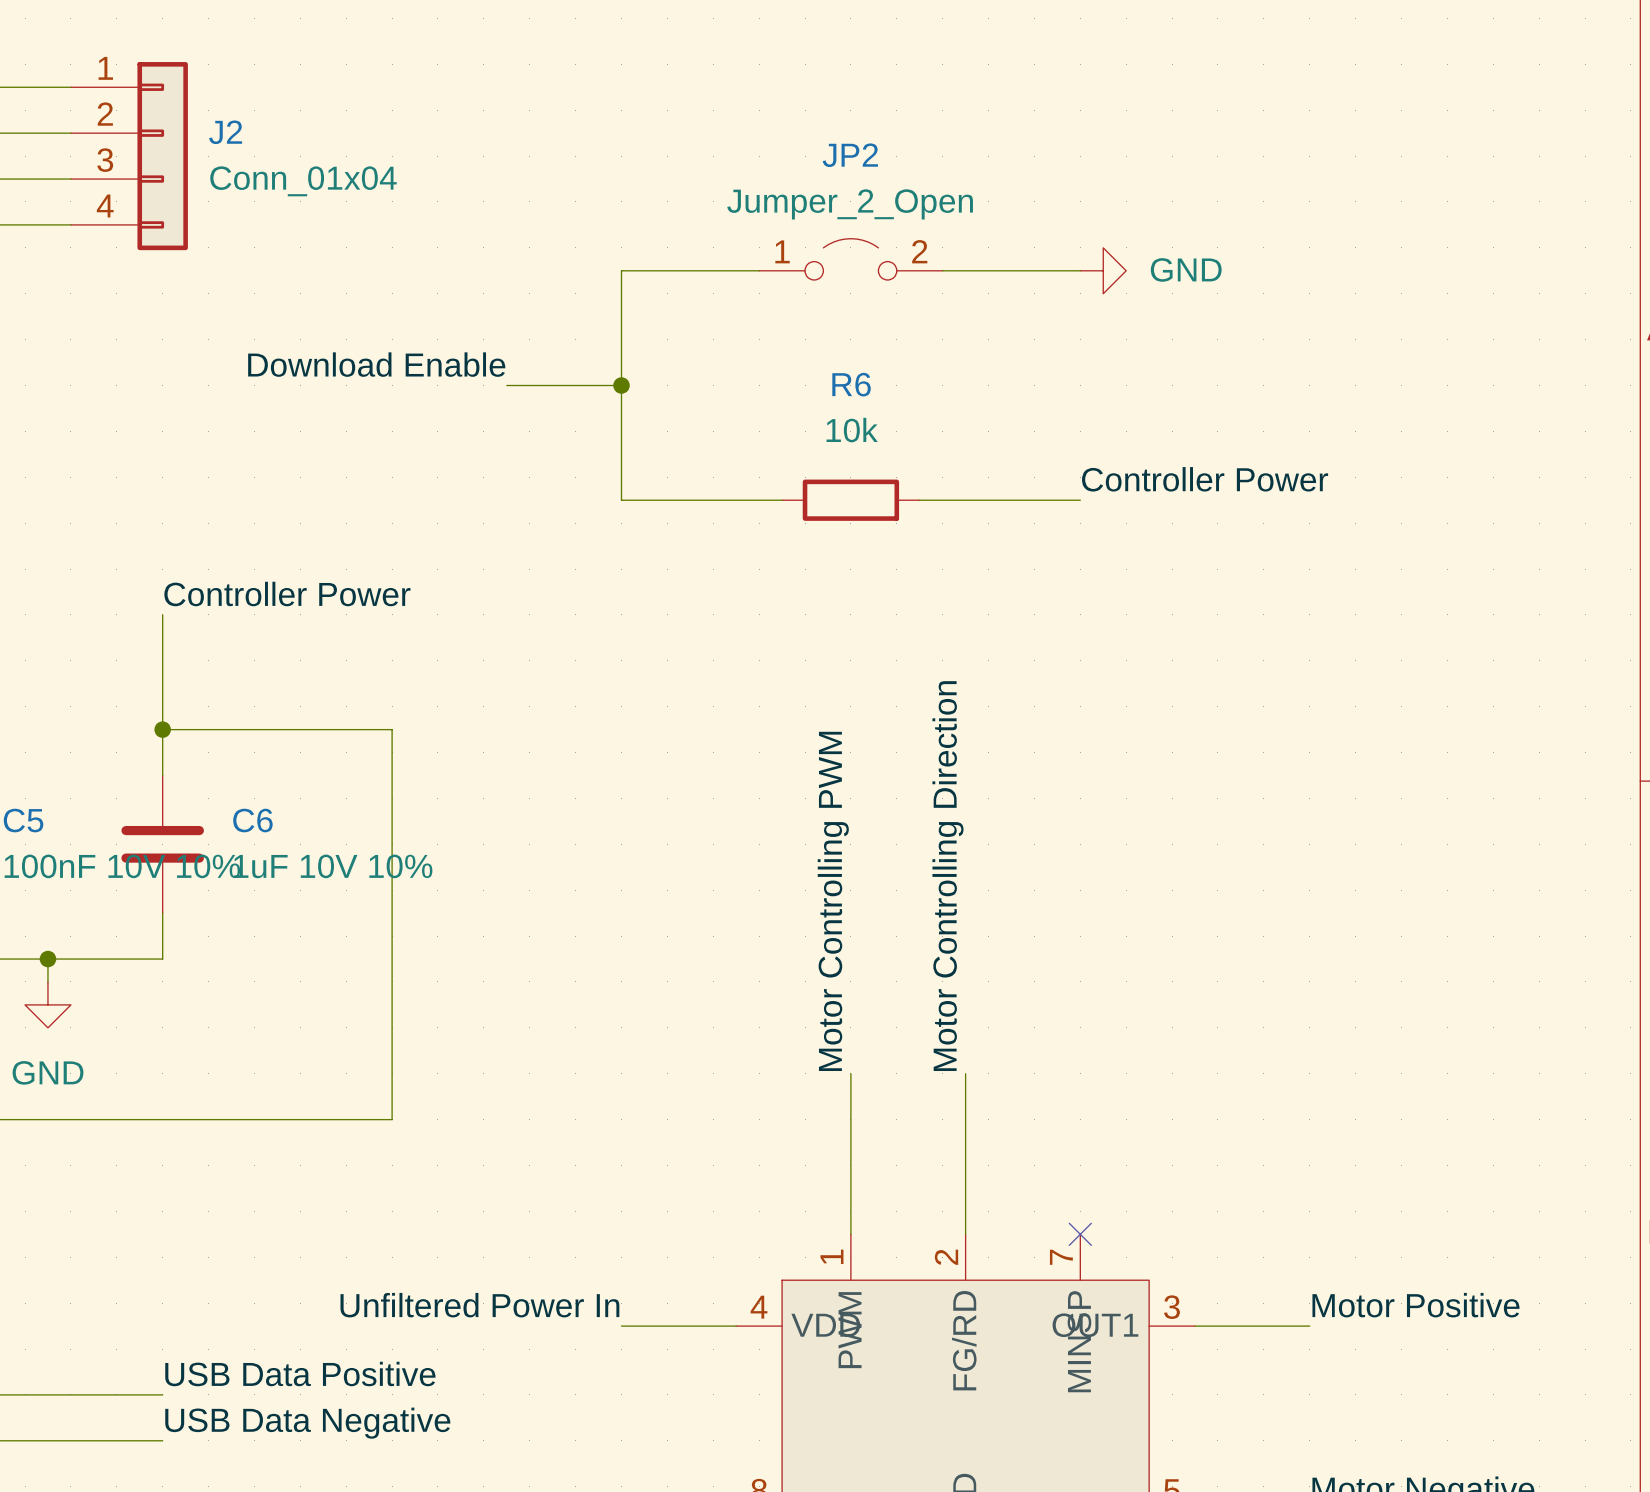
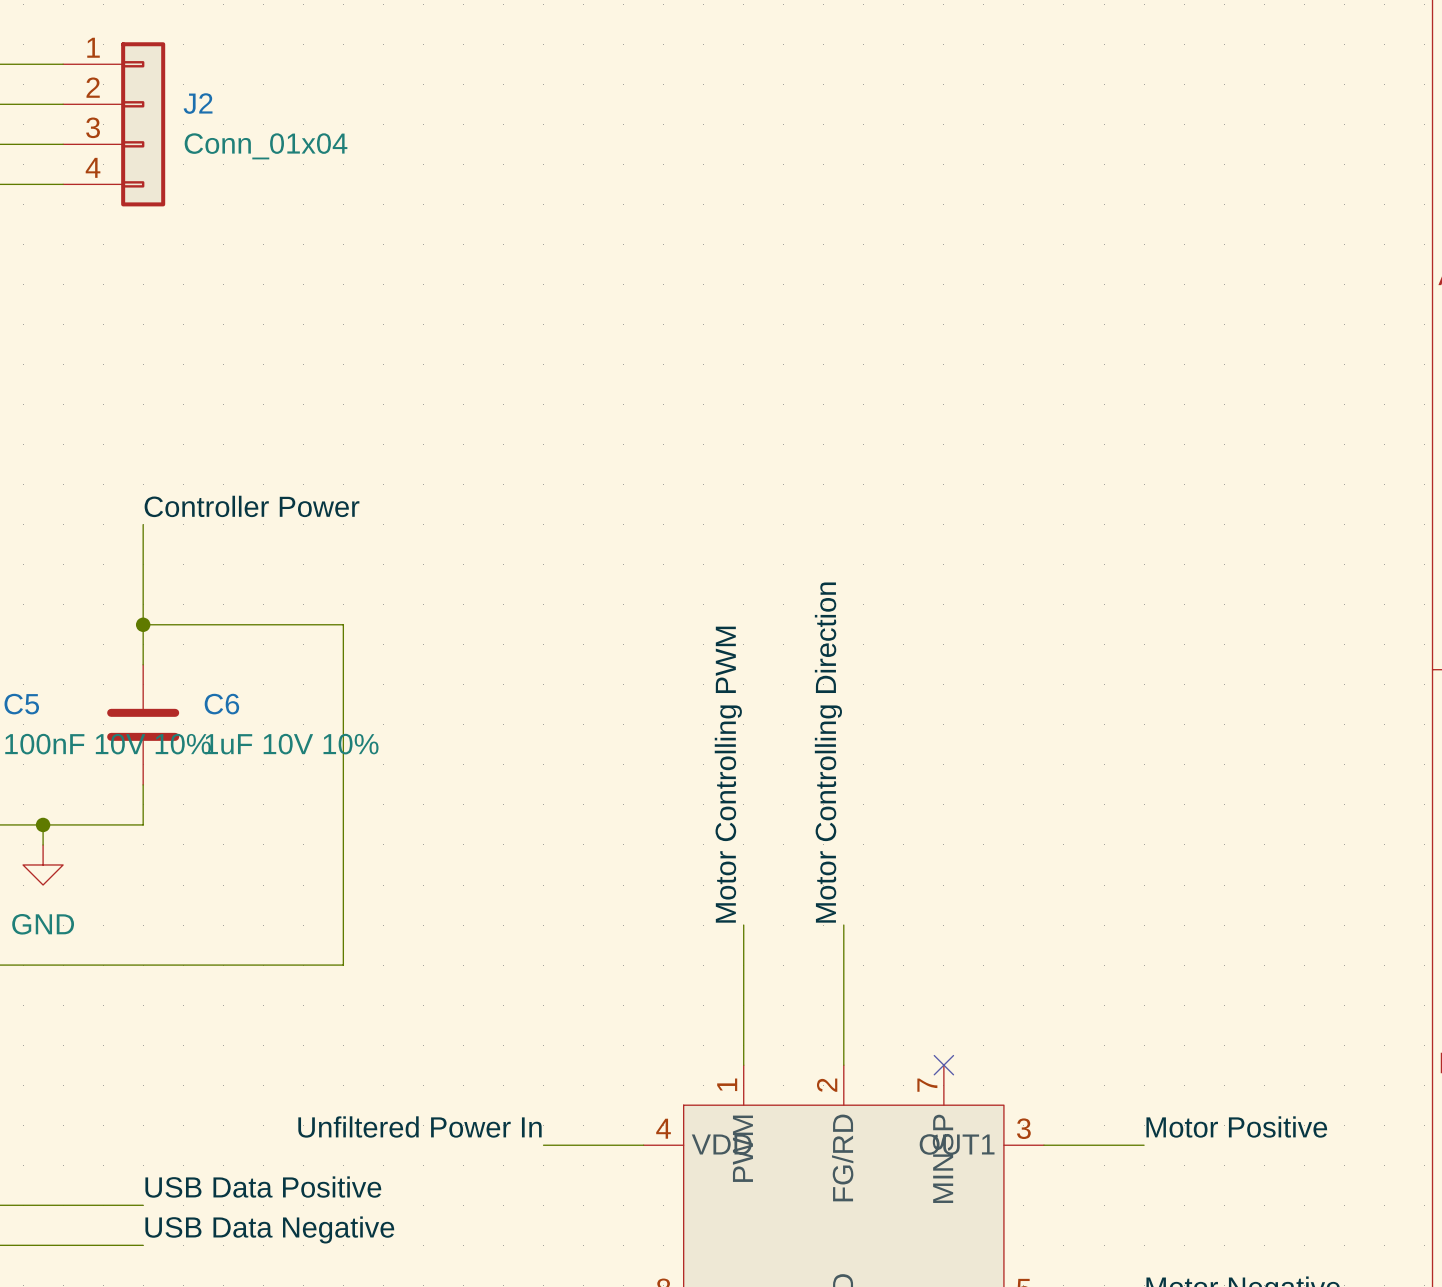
JP2: Jumper_2_Open (850, 259) -> none
wire: (759, 270) (621, 270) (621, 500) (782, 500) -> none
wire: (942, 270) (1080, 270) -> none
power symbol: GND (1103, 270) -> none
label: Download Enable (376, 364) -> none
wire: (506, 385) (621, 385) -> none
junction: (621, 385) -> none
label: Controller Power (1205, 479) -> none
R6: 10k (850, 500) -> none
wire: (919, 500) (1080, 500) -> none

